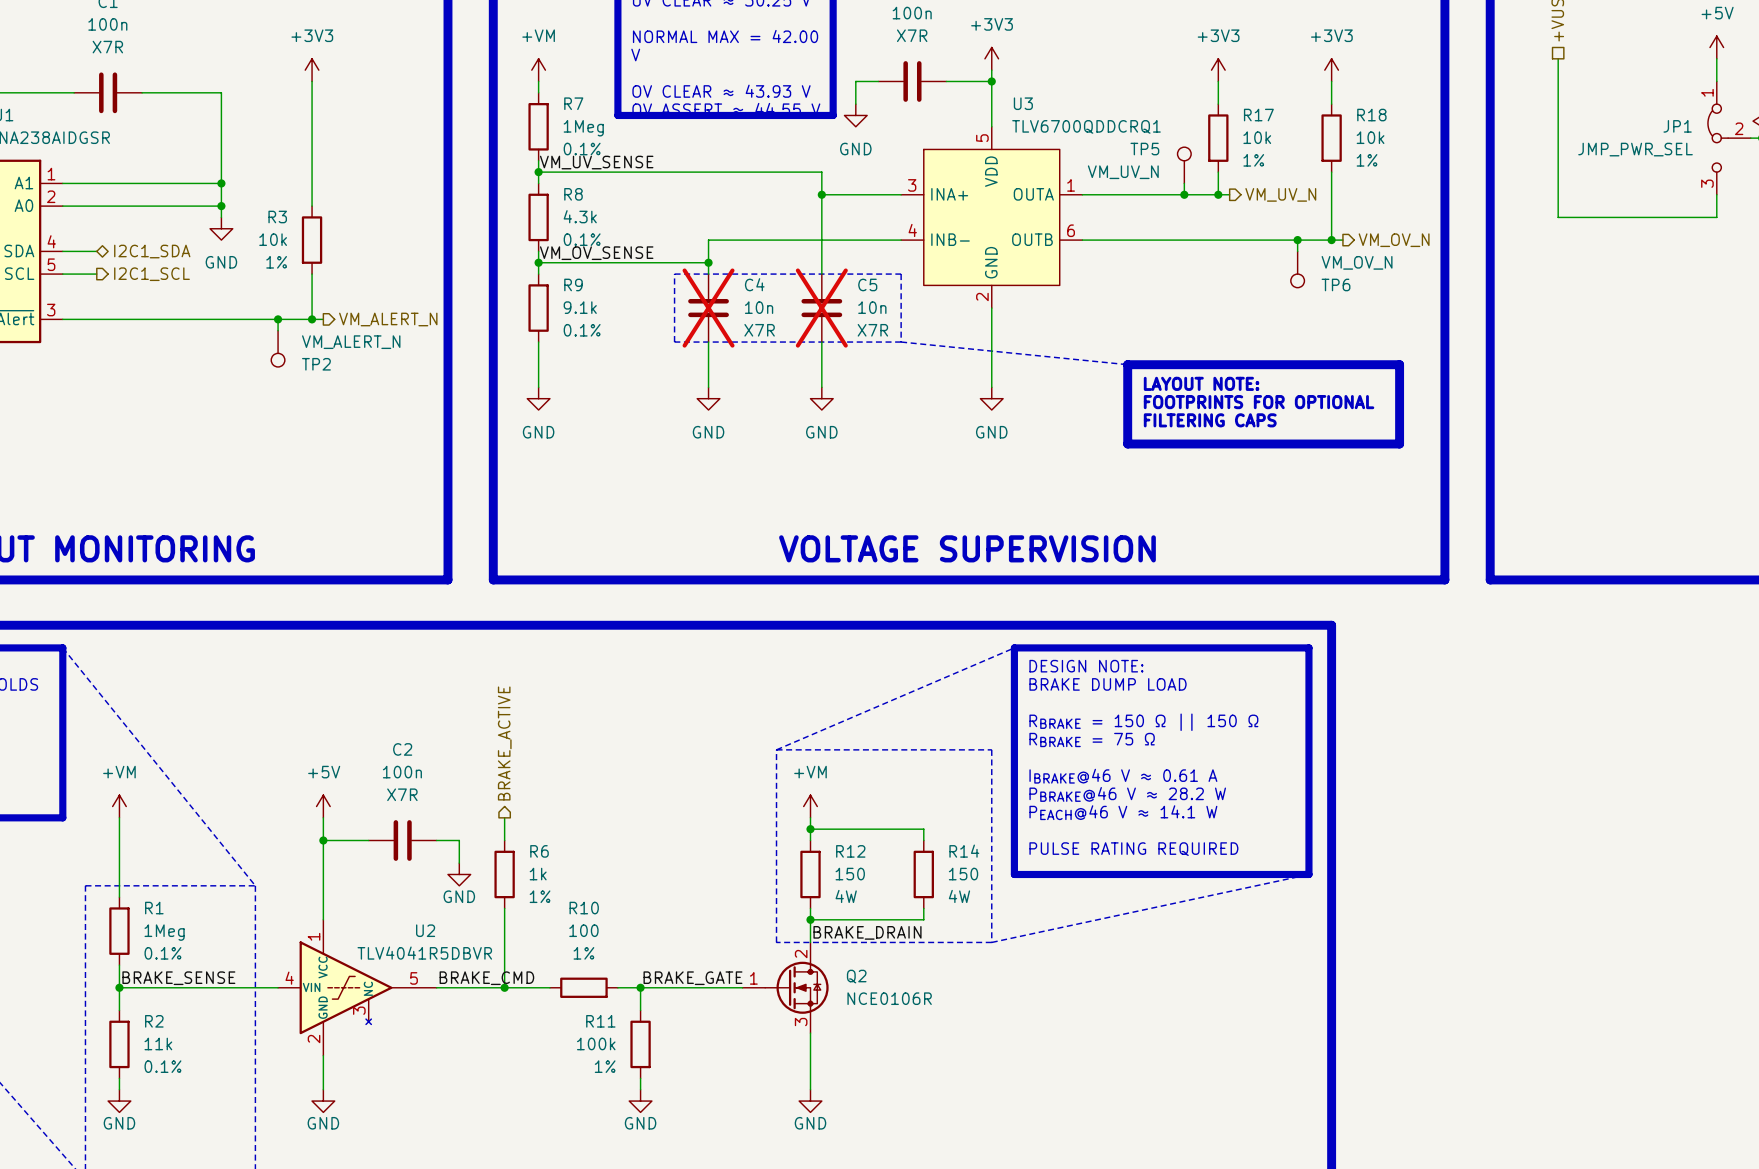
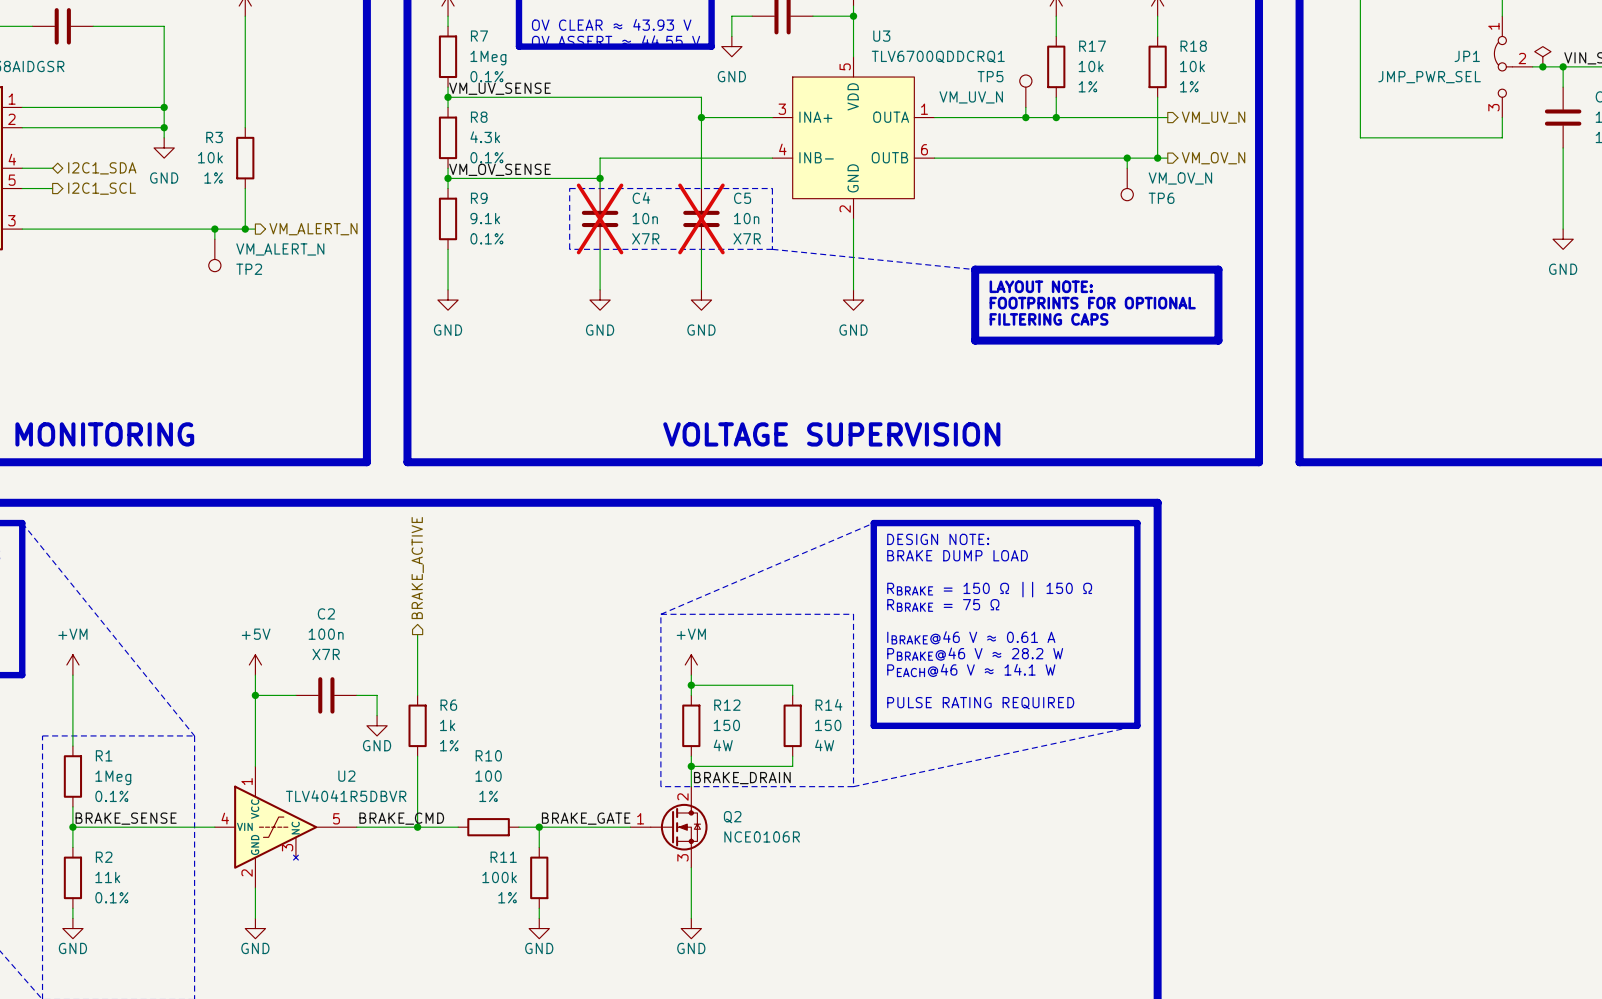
wire: none -> (1066, 117) (1167, 117)
hierarchical label position: VM_UV_N (1280, 194) -> VM_UV_N (1213, 117)
hierarchical label position: BRAKE_ACTIVE (504, 743) -> BRAKE_ACTIVE (417, 568)
wire: none -> (417, 634) (417, 675)

